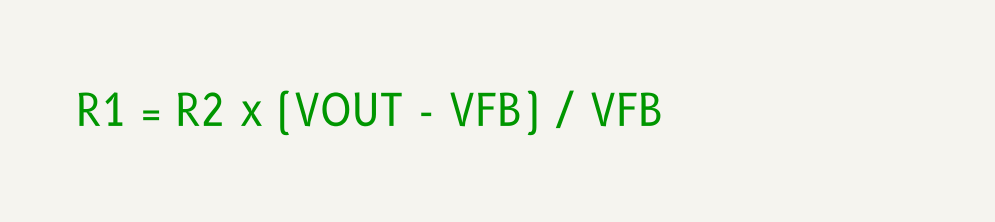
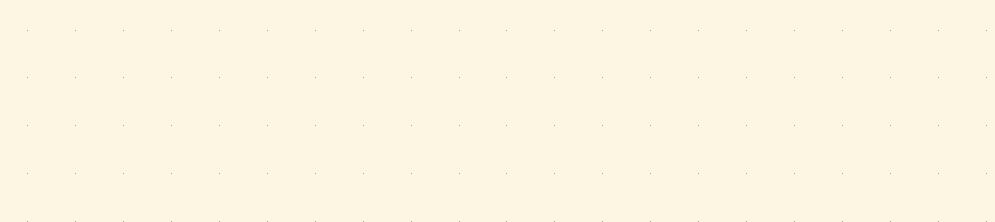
text: R1 = R2 x (VOUT - VFB) / VFB (369, 112) -> none

